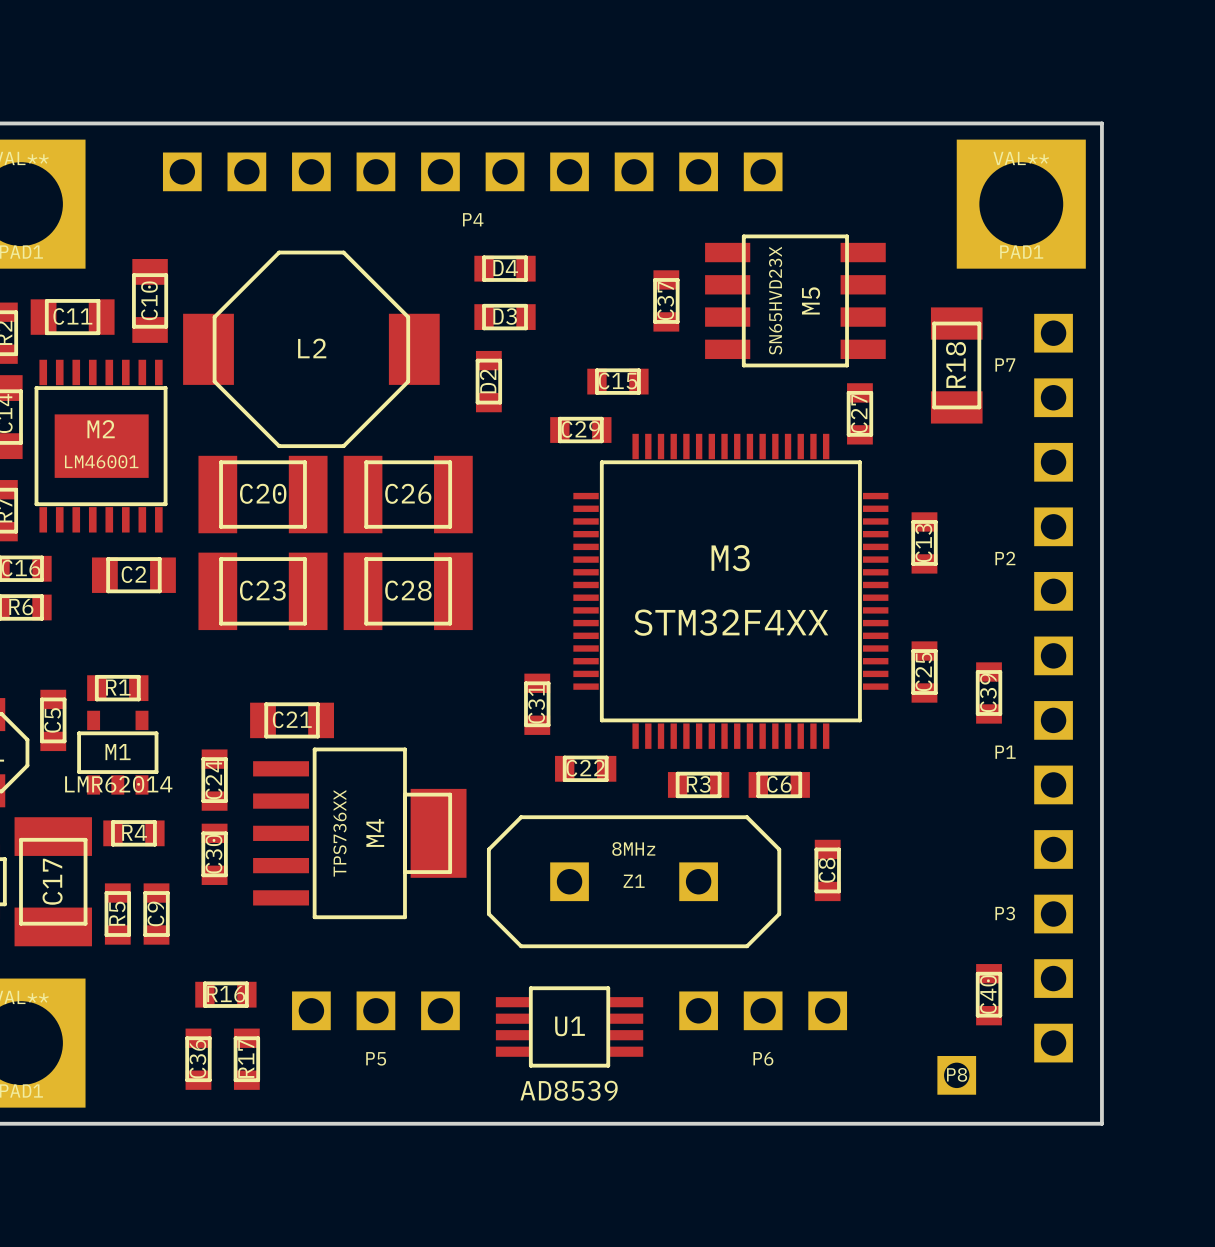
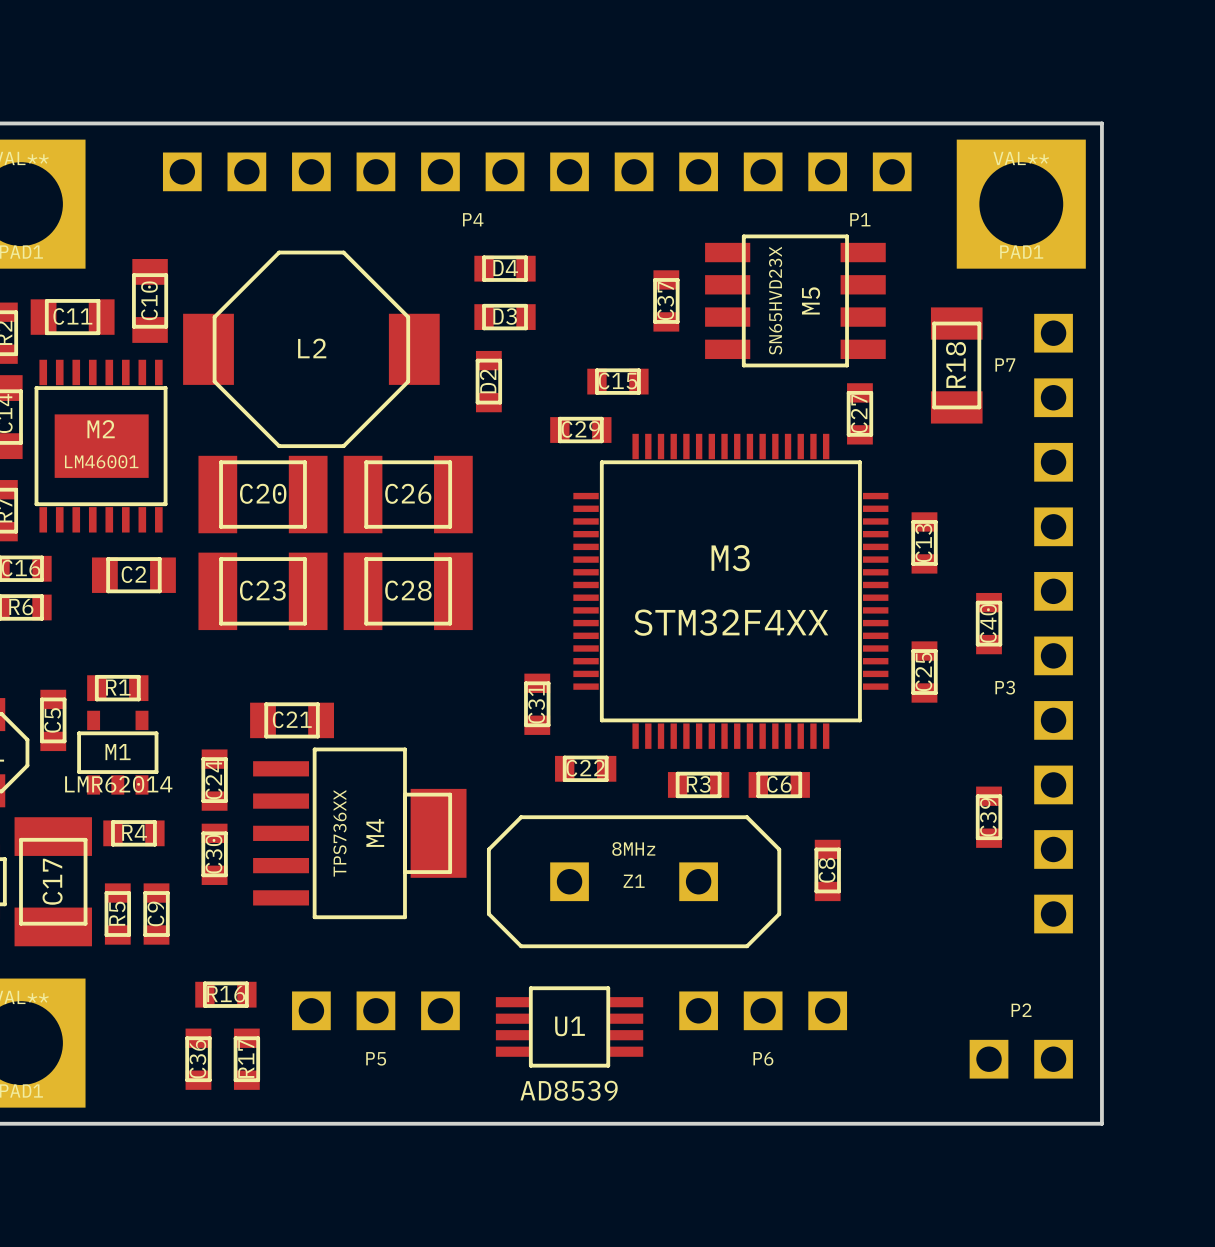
P2 footprint: [1034, 442, 1073, 676] -> [969, 1039, 1073, 1079]
P2 name position: P2 (1005, 558) -> P2 (1021, 1010)
C39 position: (989, 692) -> (989, 817)
P1 name position: P1 (1005, 752) -> P1 (860, 219)
P1 rotation: 0° (1053, 752) -> 90° clockwise (859, 171)
P1 position: (1053, 752) -> (859, 171)
P3 footprint: [1034, 830, 1073, 1063] -> [1034, 442, 1073, 934]
C40 position: (989, 994) -> (989, 623)
P8: (956, 1075) -> none

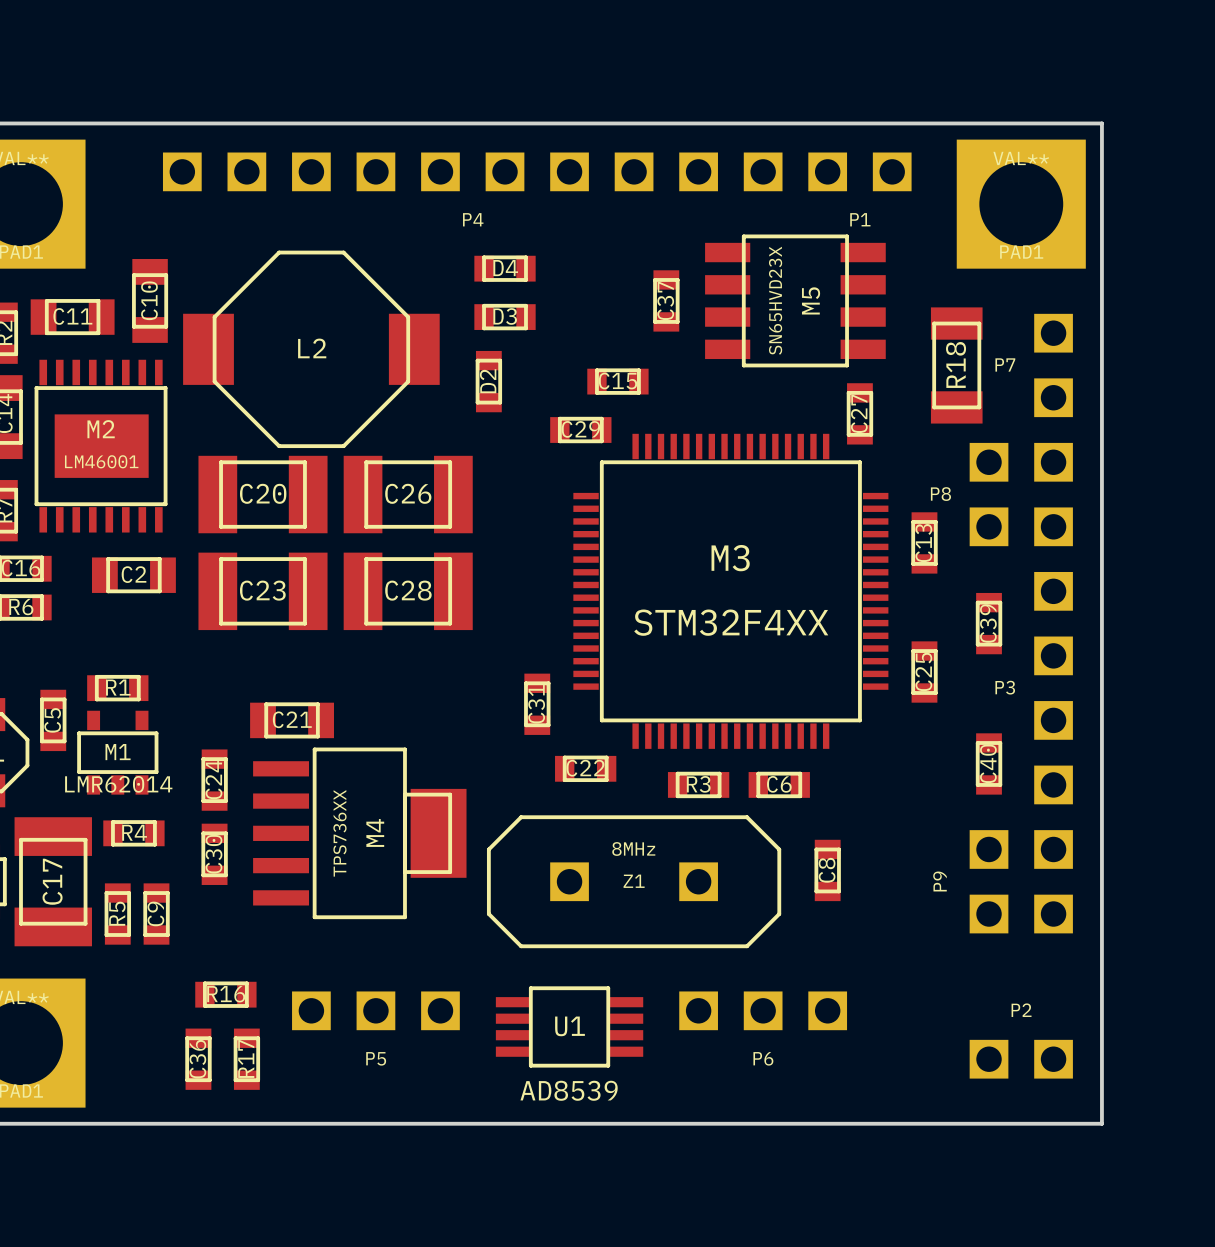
P8: none -> (989, 494)
C40 name: C40 (988, 623) -> C39 (988, 623)
C40: none -> (989, 763)
C39: (989, 817) -> none
P9: none -> (989, 881)

